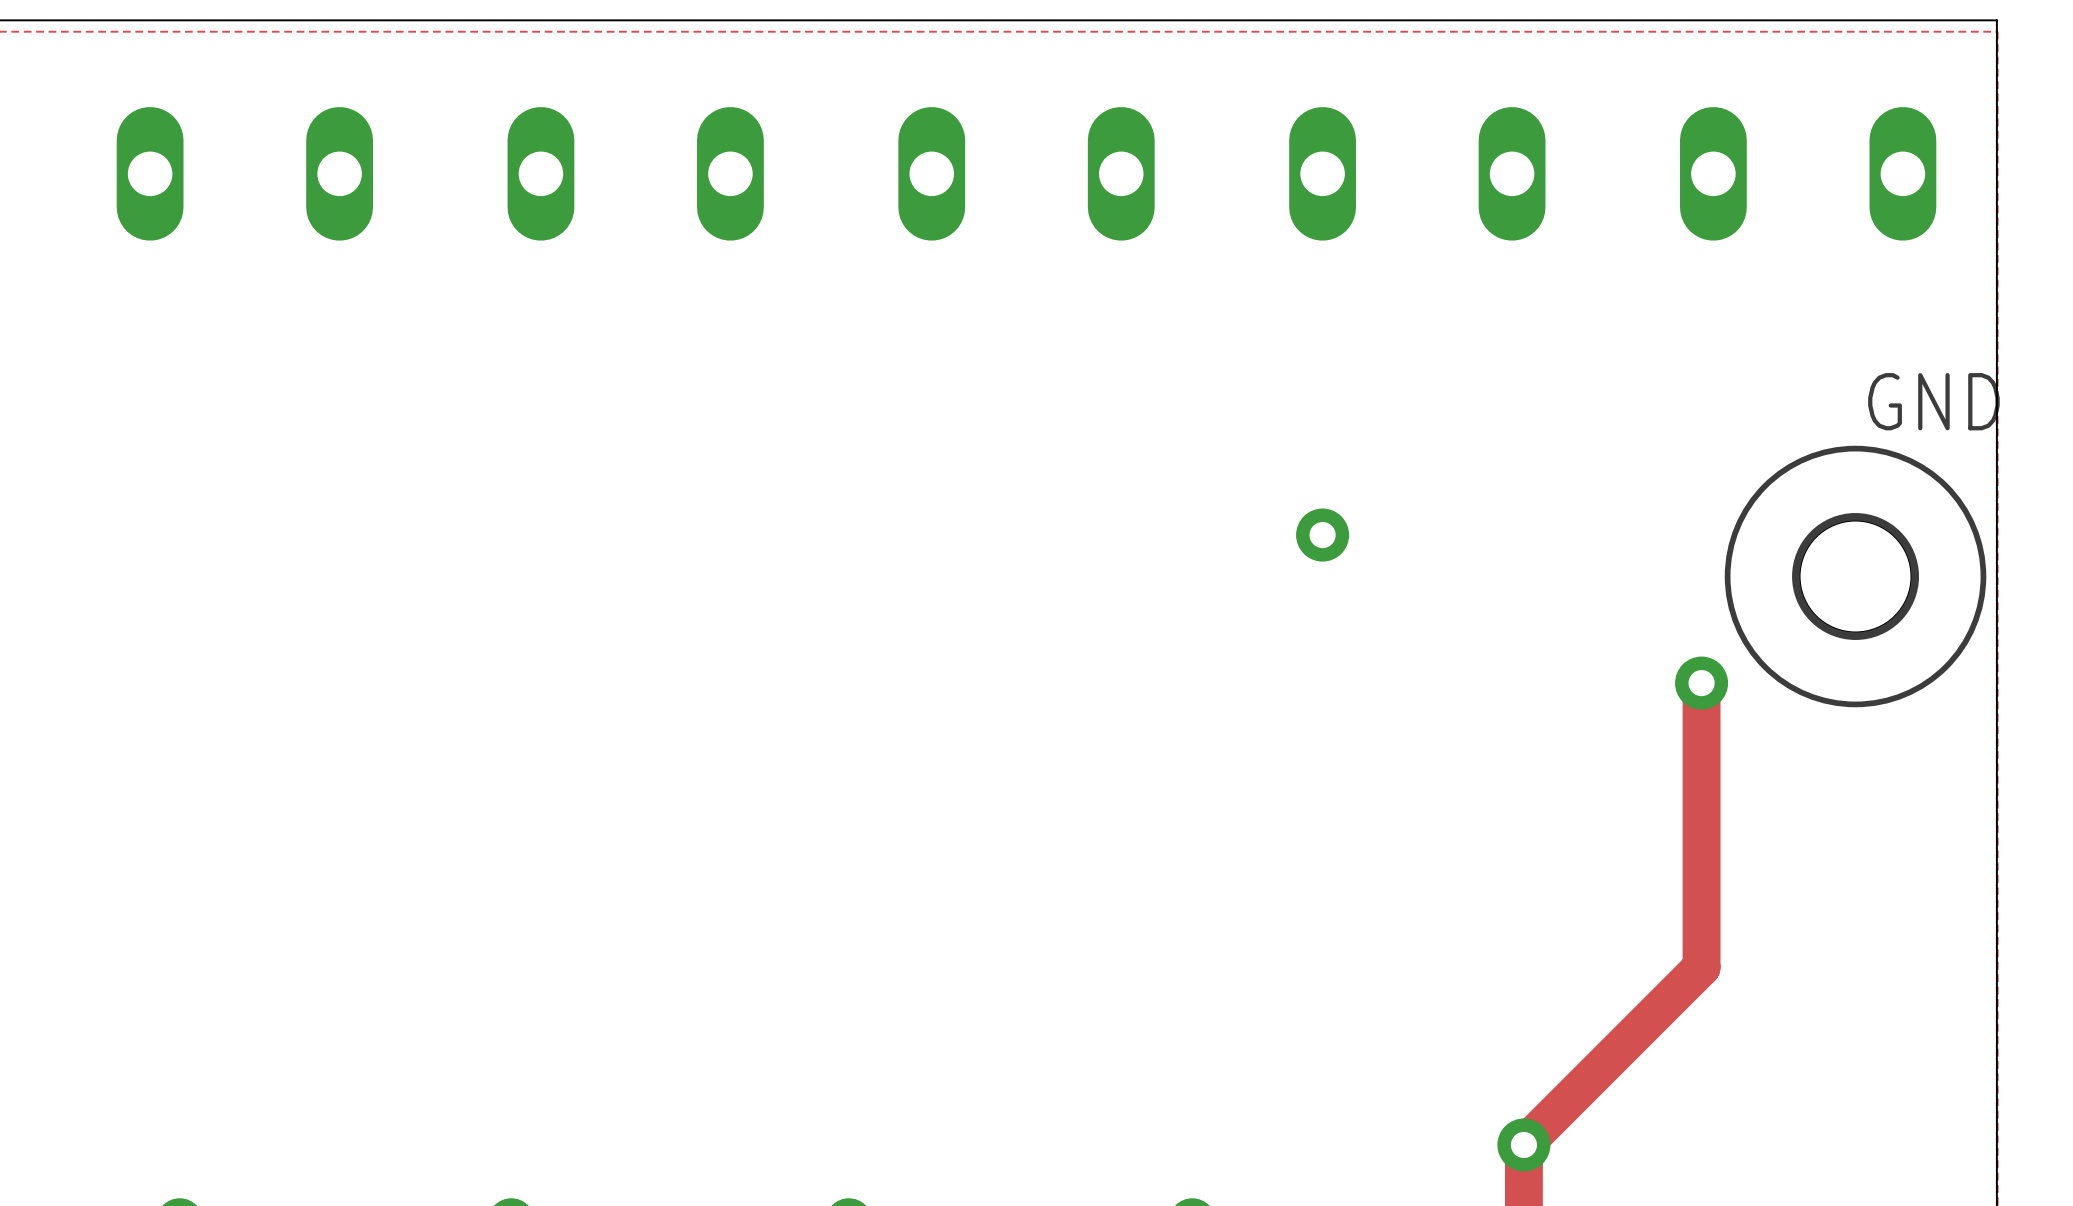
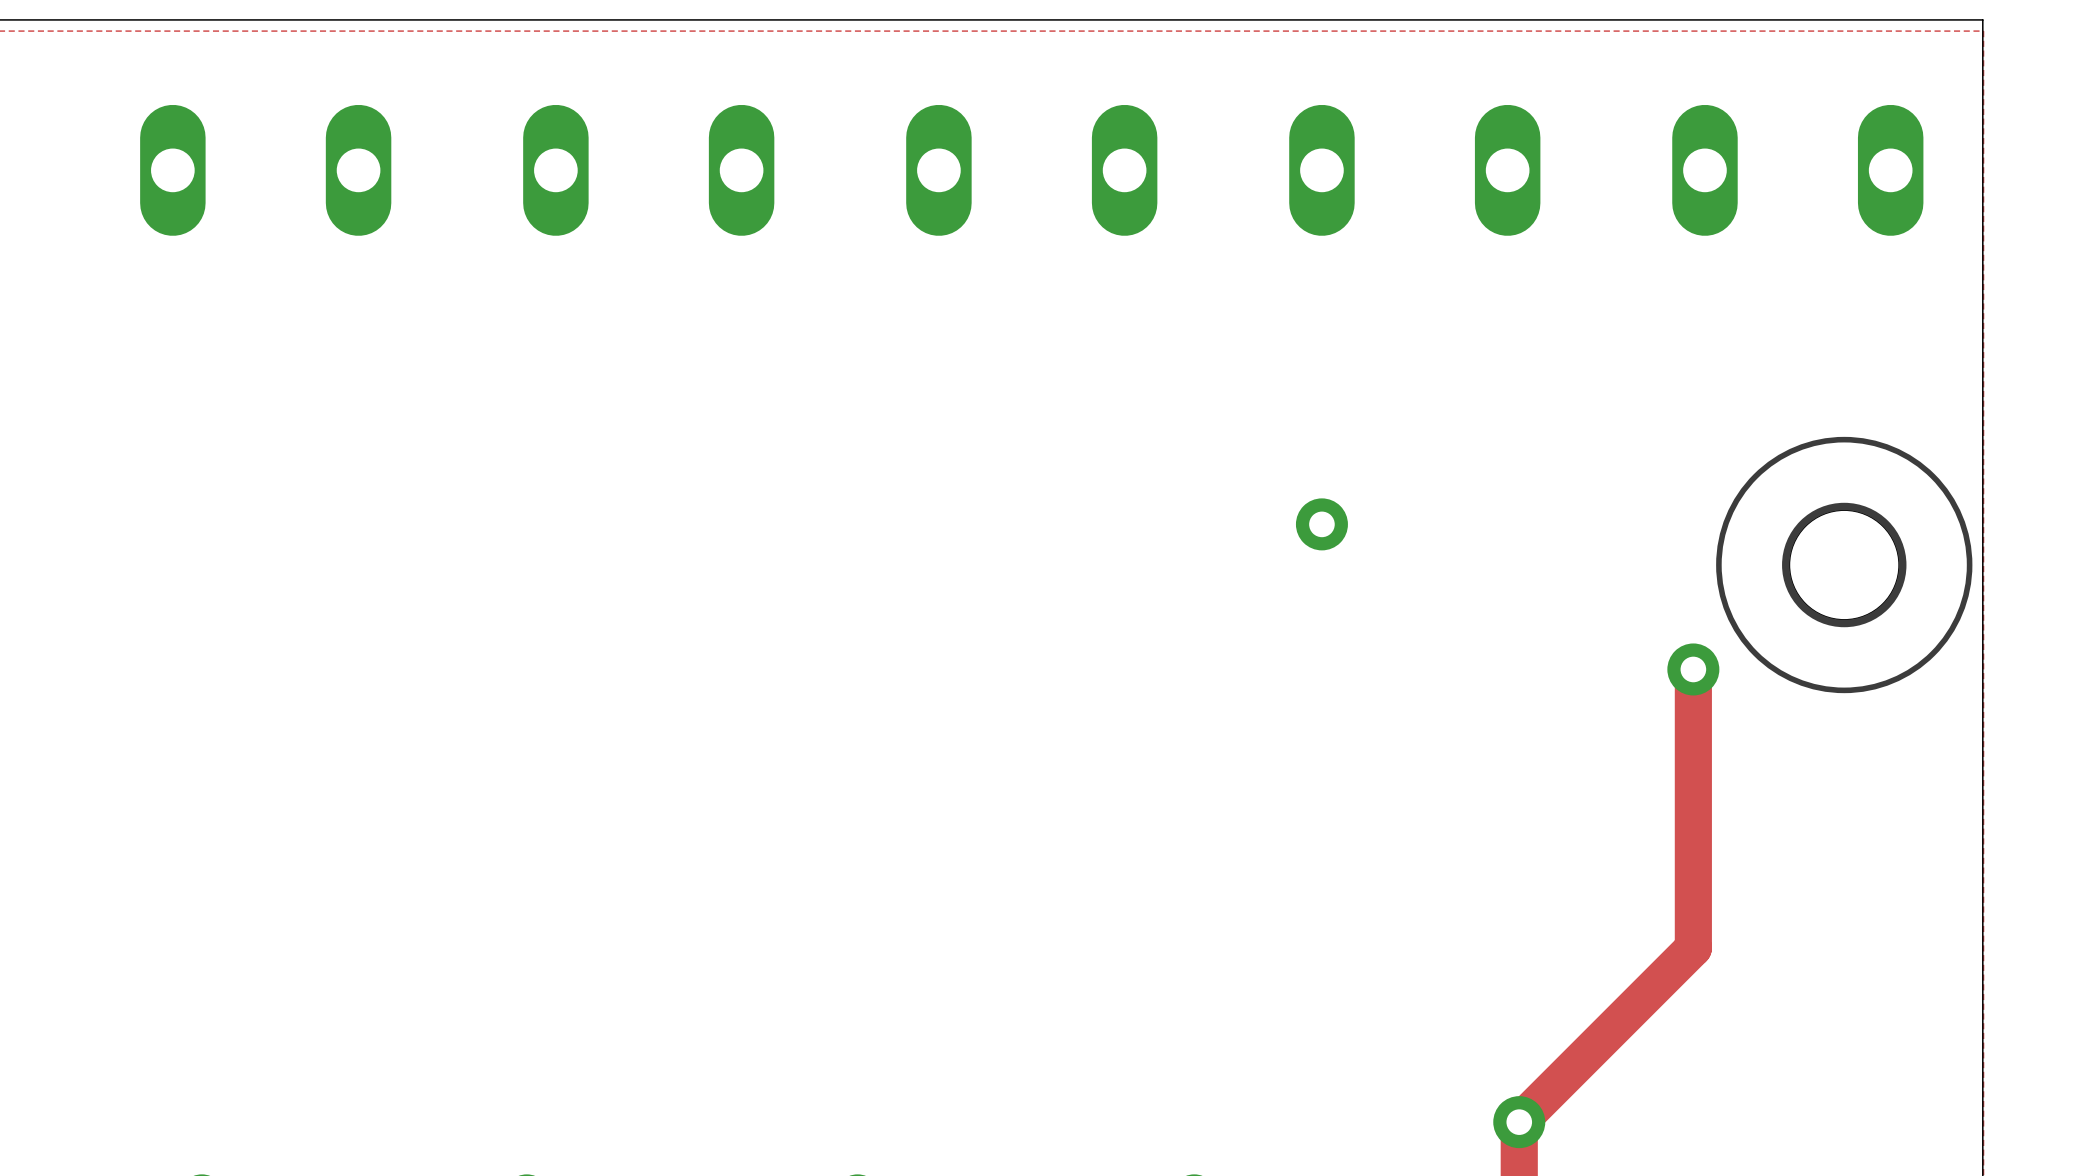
text: GND (1933, 401) -> none

